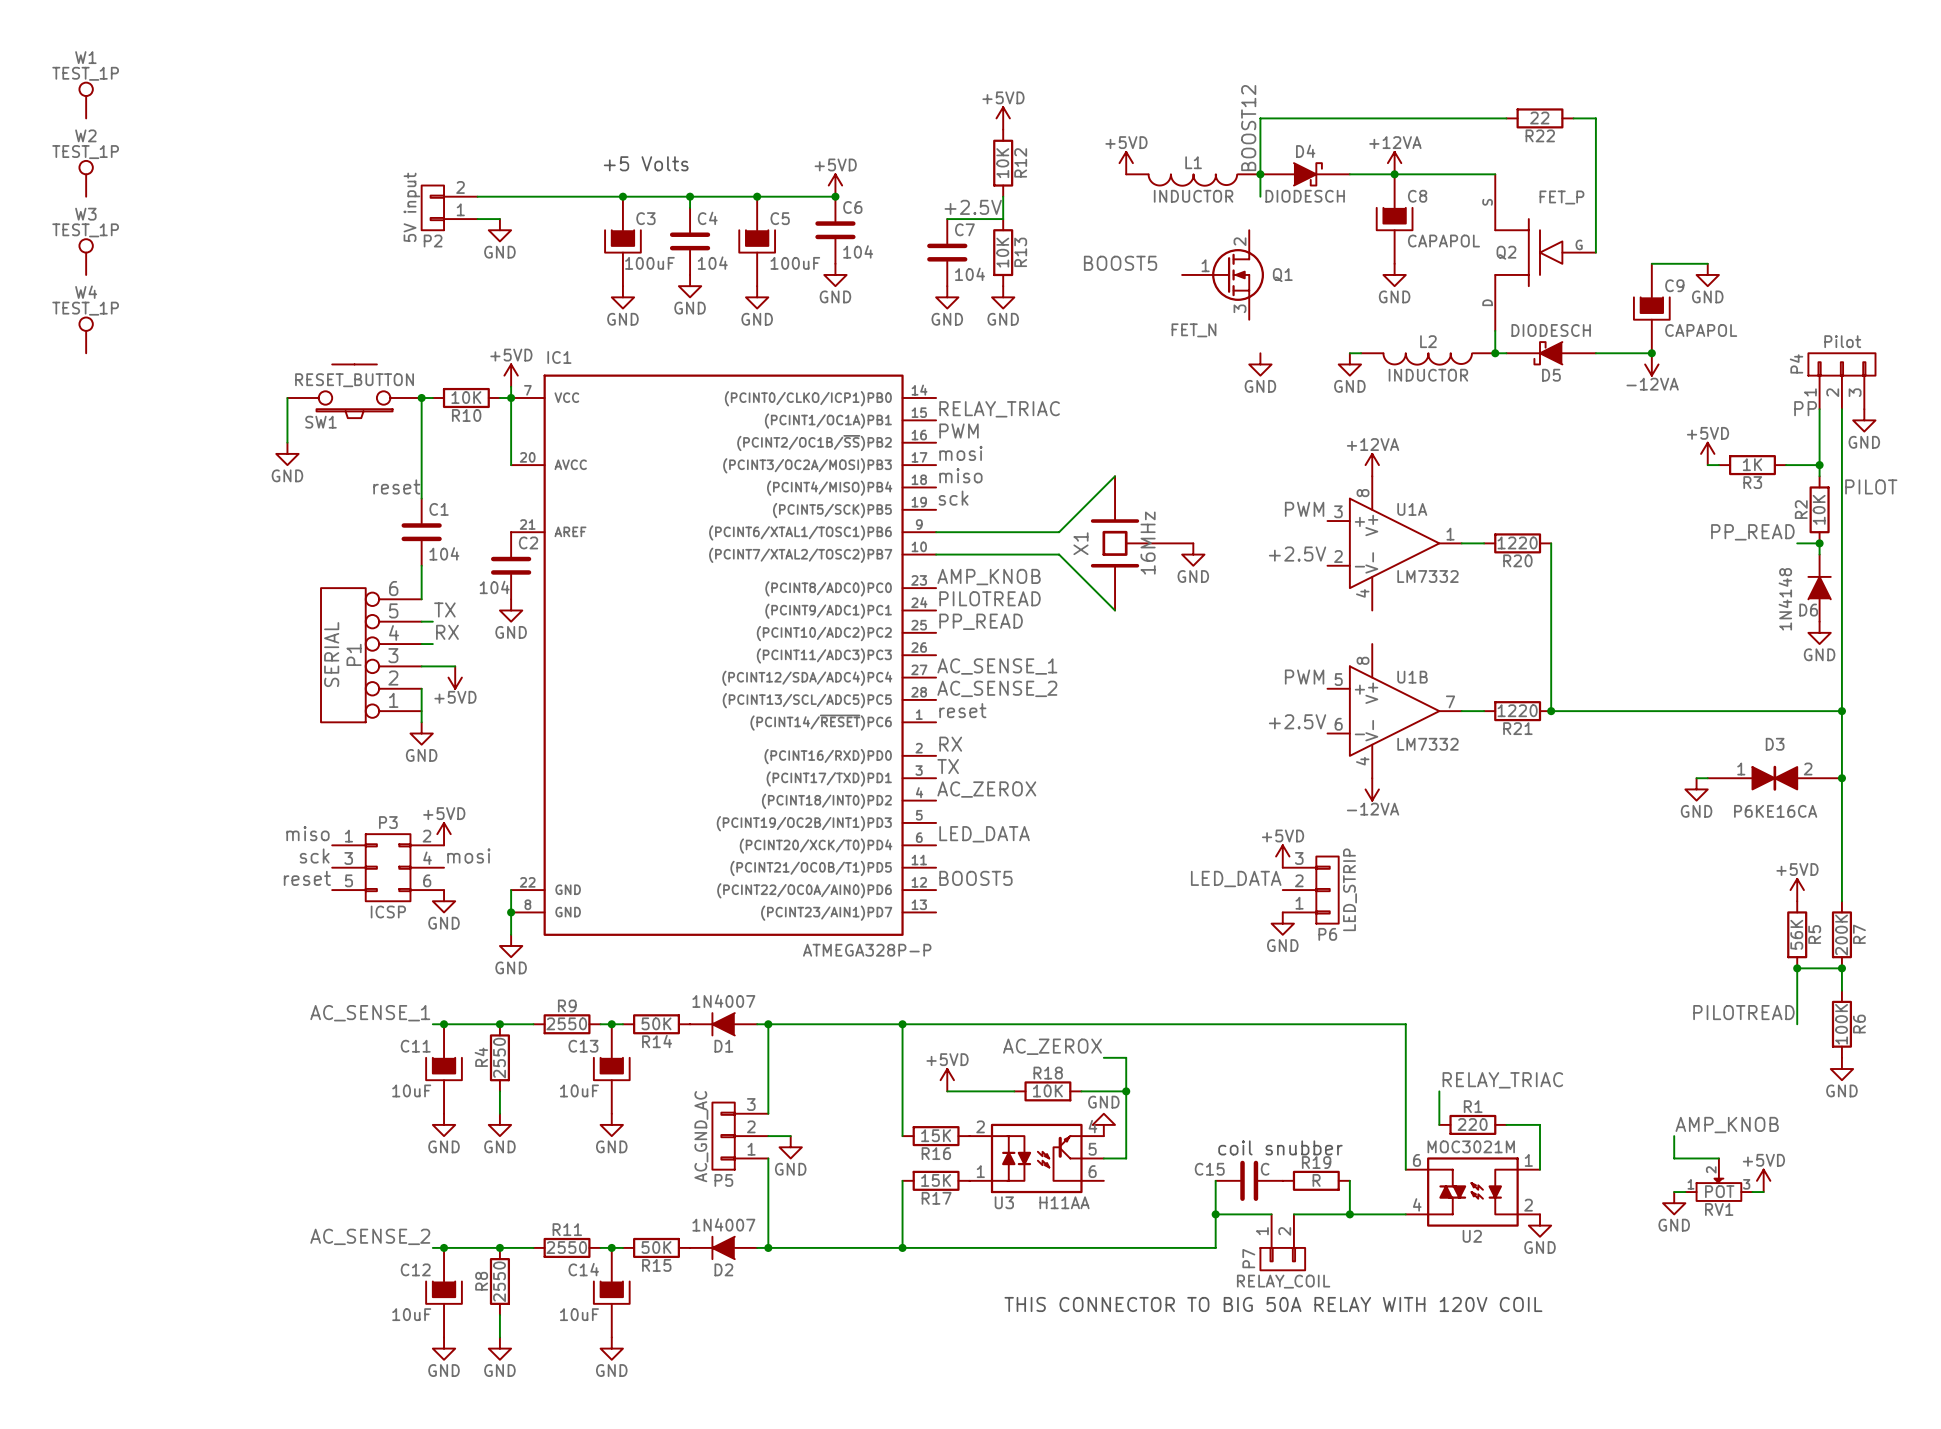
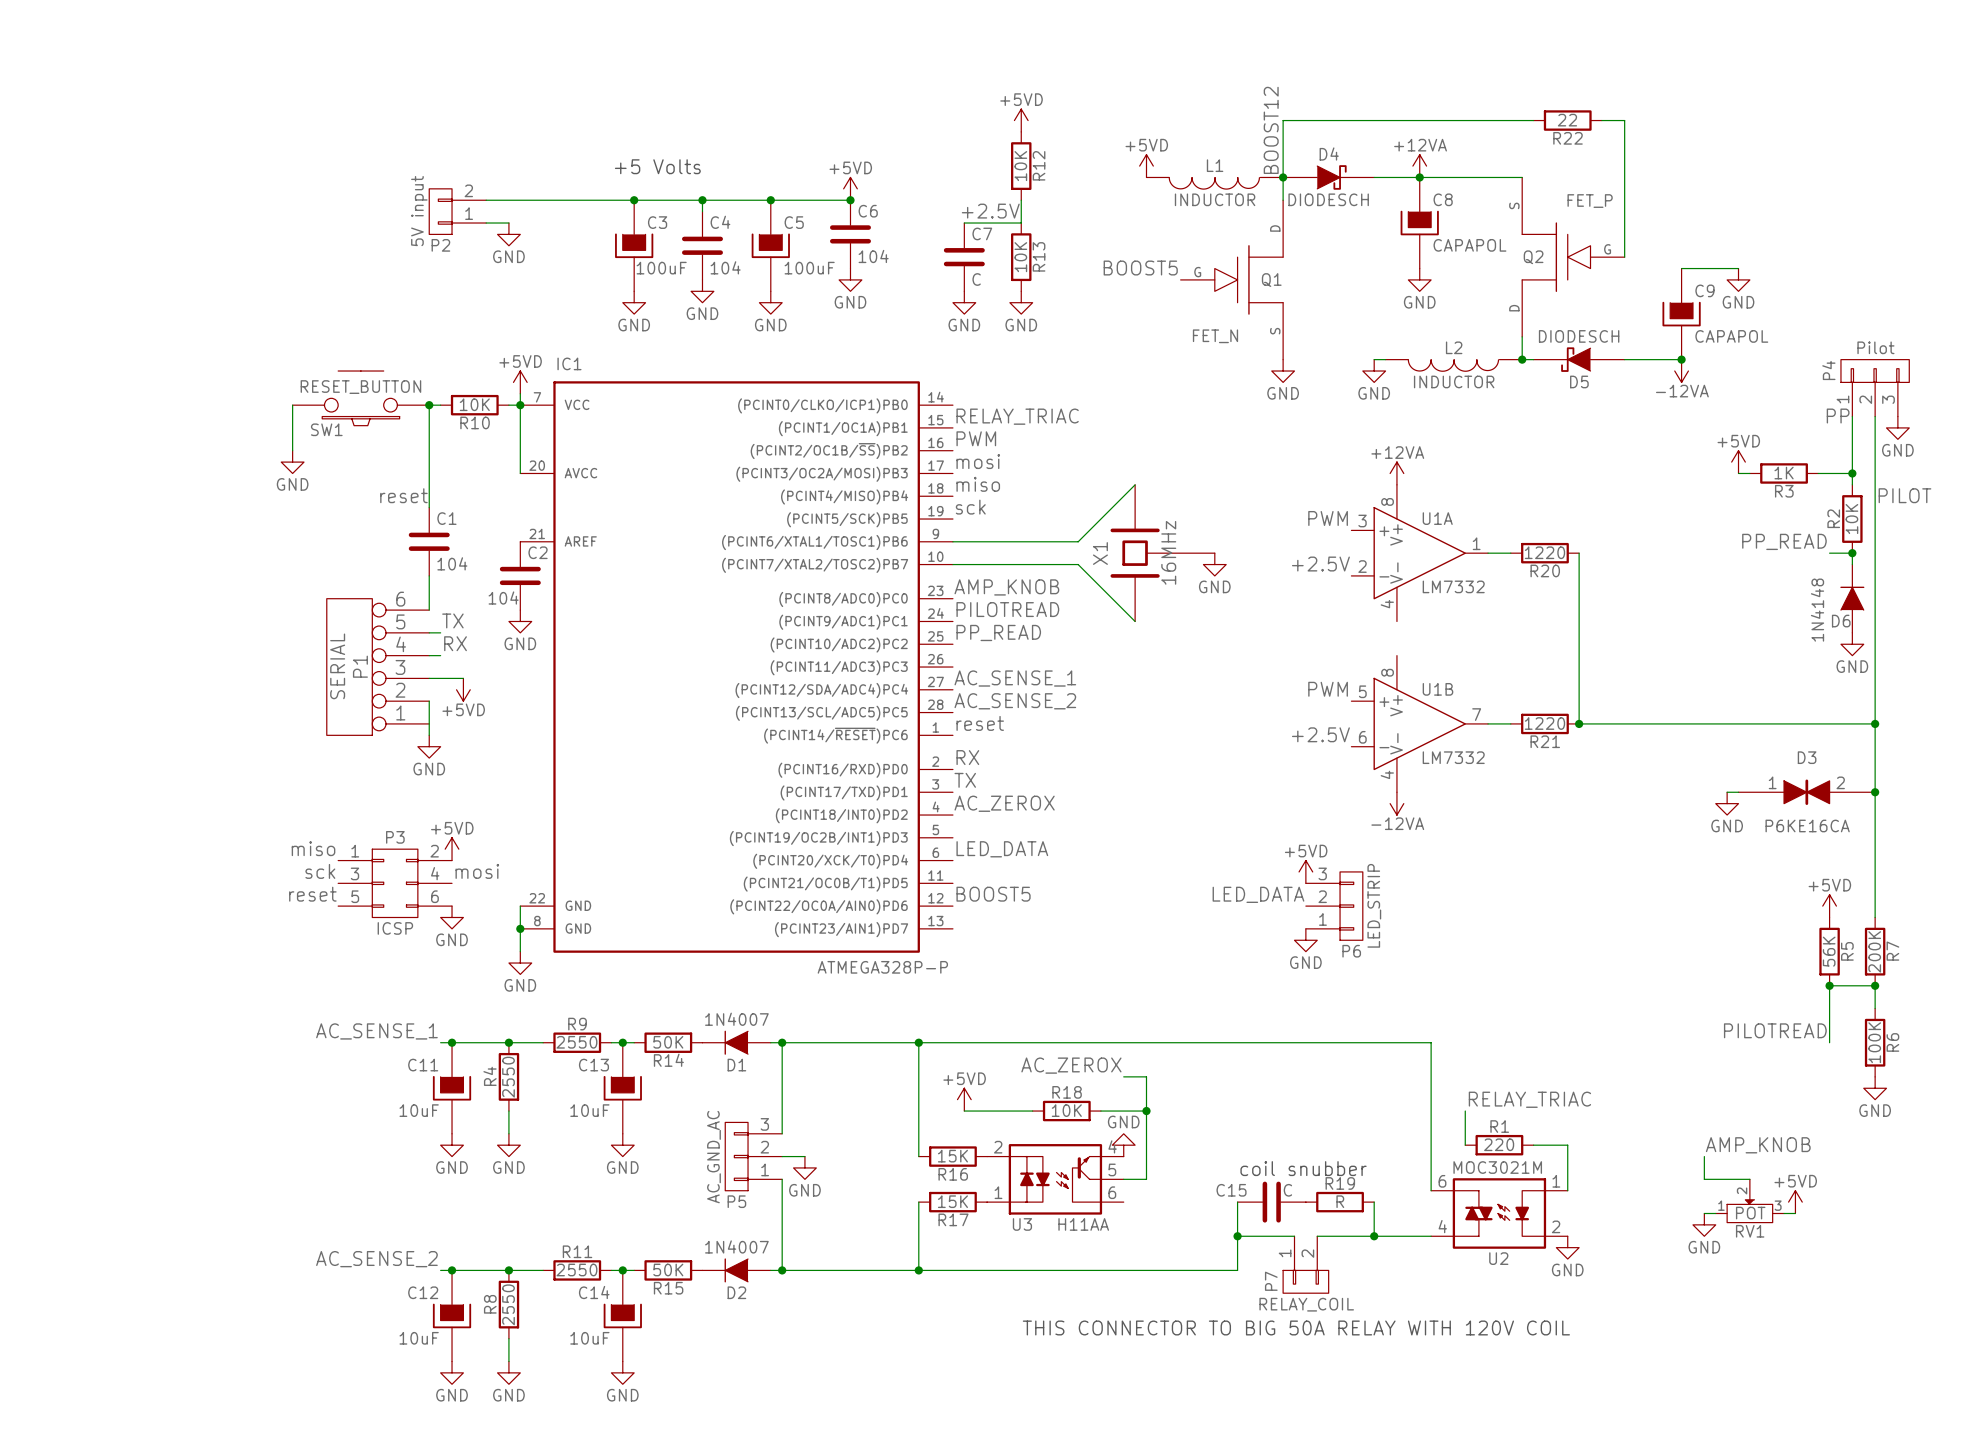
W1: TEST_1P (86, 100) -> none
W2: TEST_1P (86, 178) -> none
Q1 symbol: [1182, 230, 1264, 320] -> [1180, 200, 1284, 360]
W3: TEST_1P (86, 257) -> none
C7 value: 104 (969, 274) -> C (976, 279)
Q1 name position: Q1 (1282, 275) -> Q1 (1271, 280)
W4: TEST_1P (86, 335) -> none

